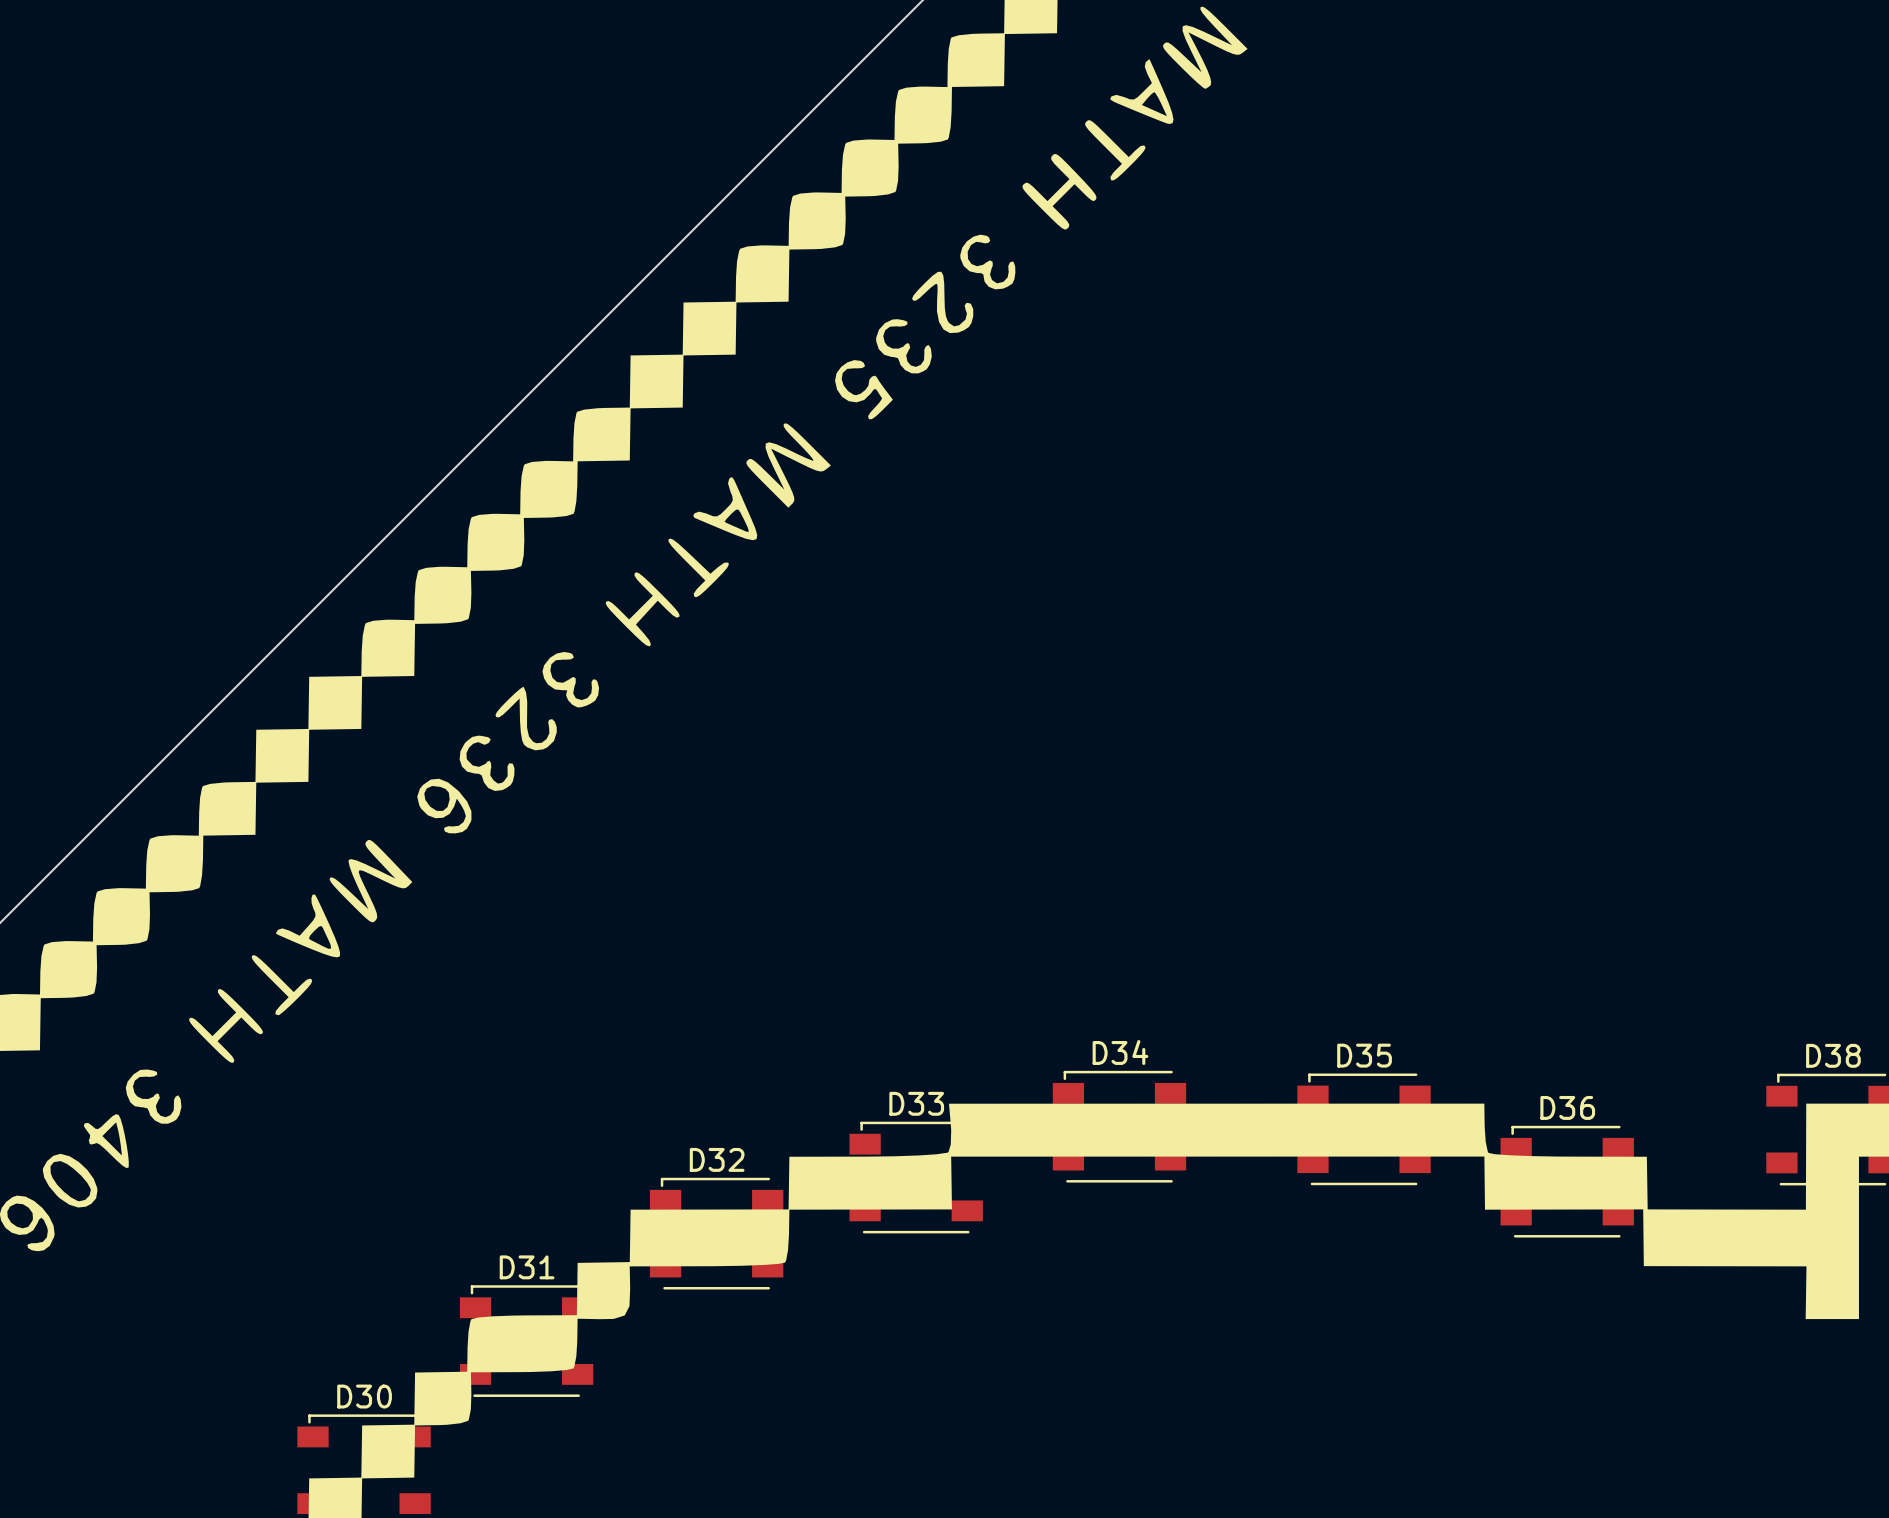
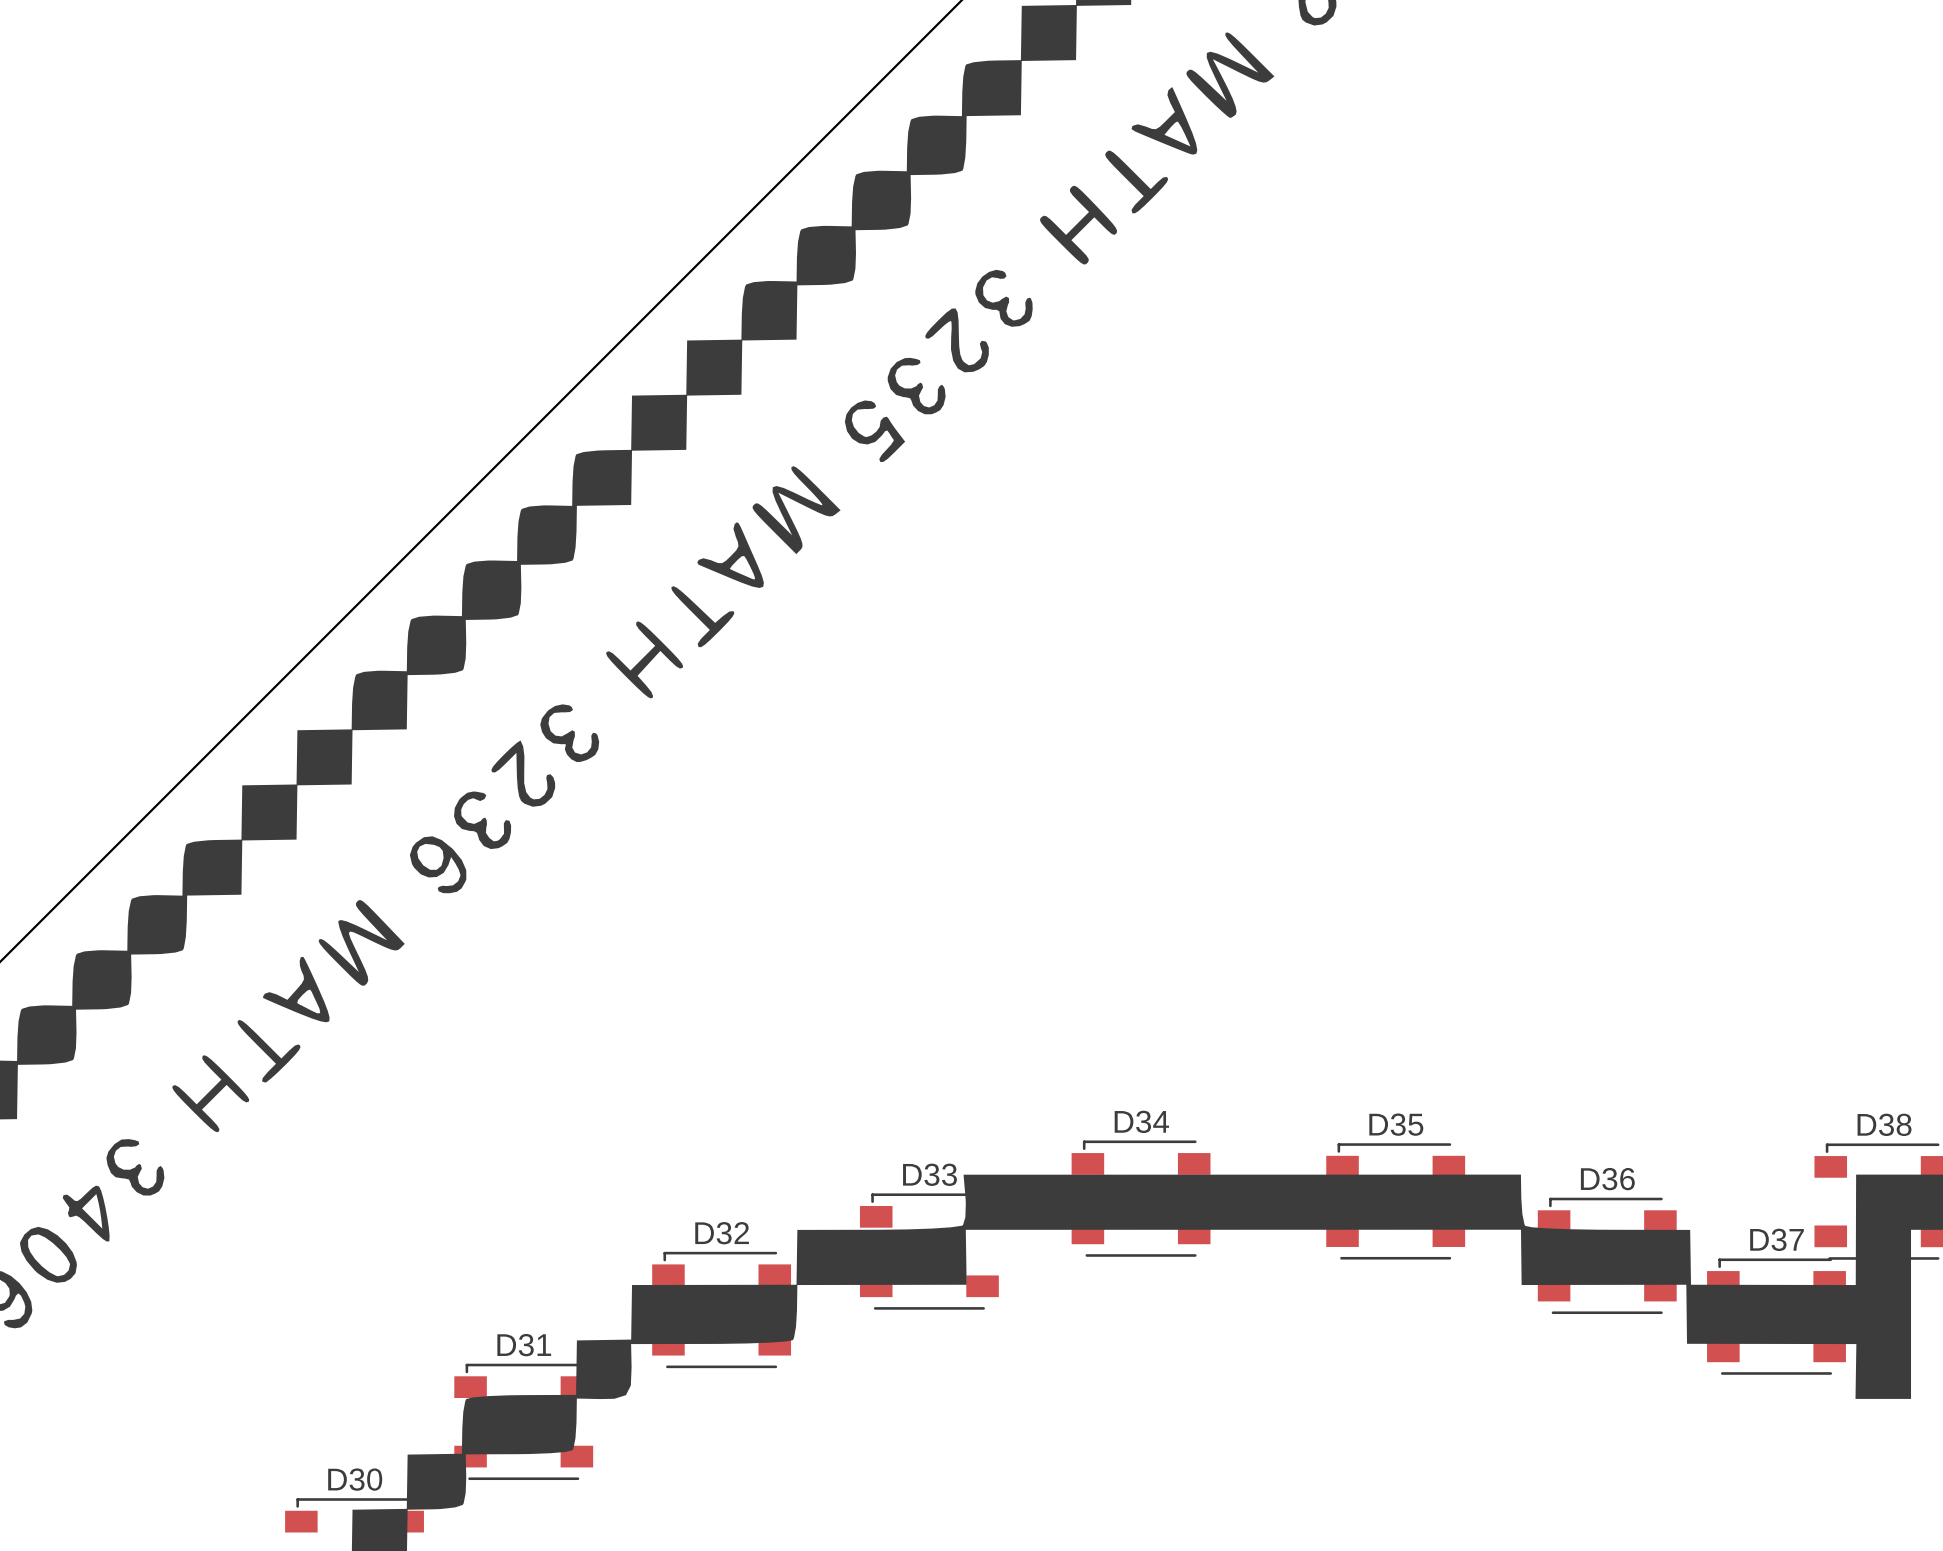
D37: none -> (1776, 1316)

